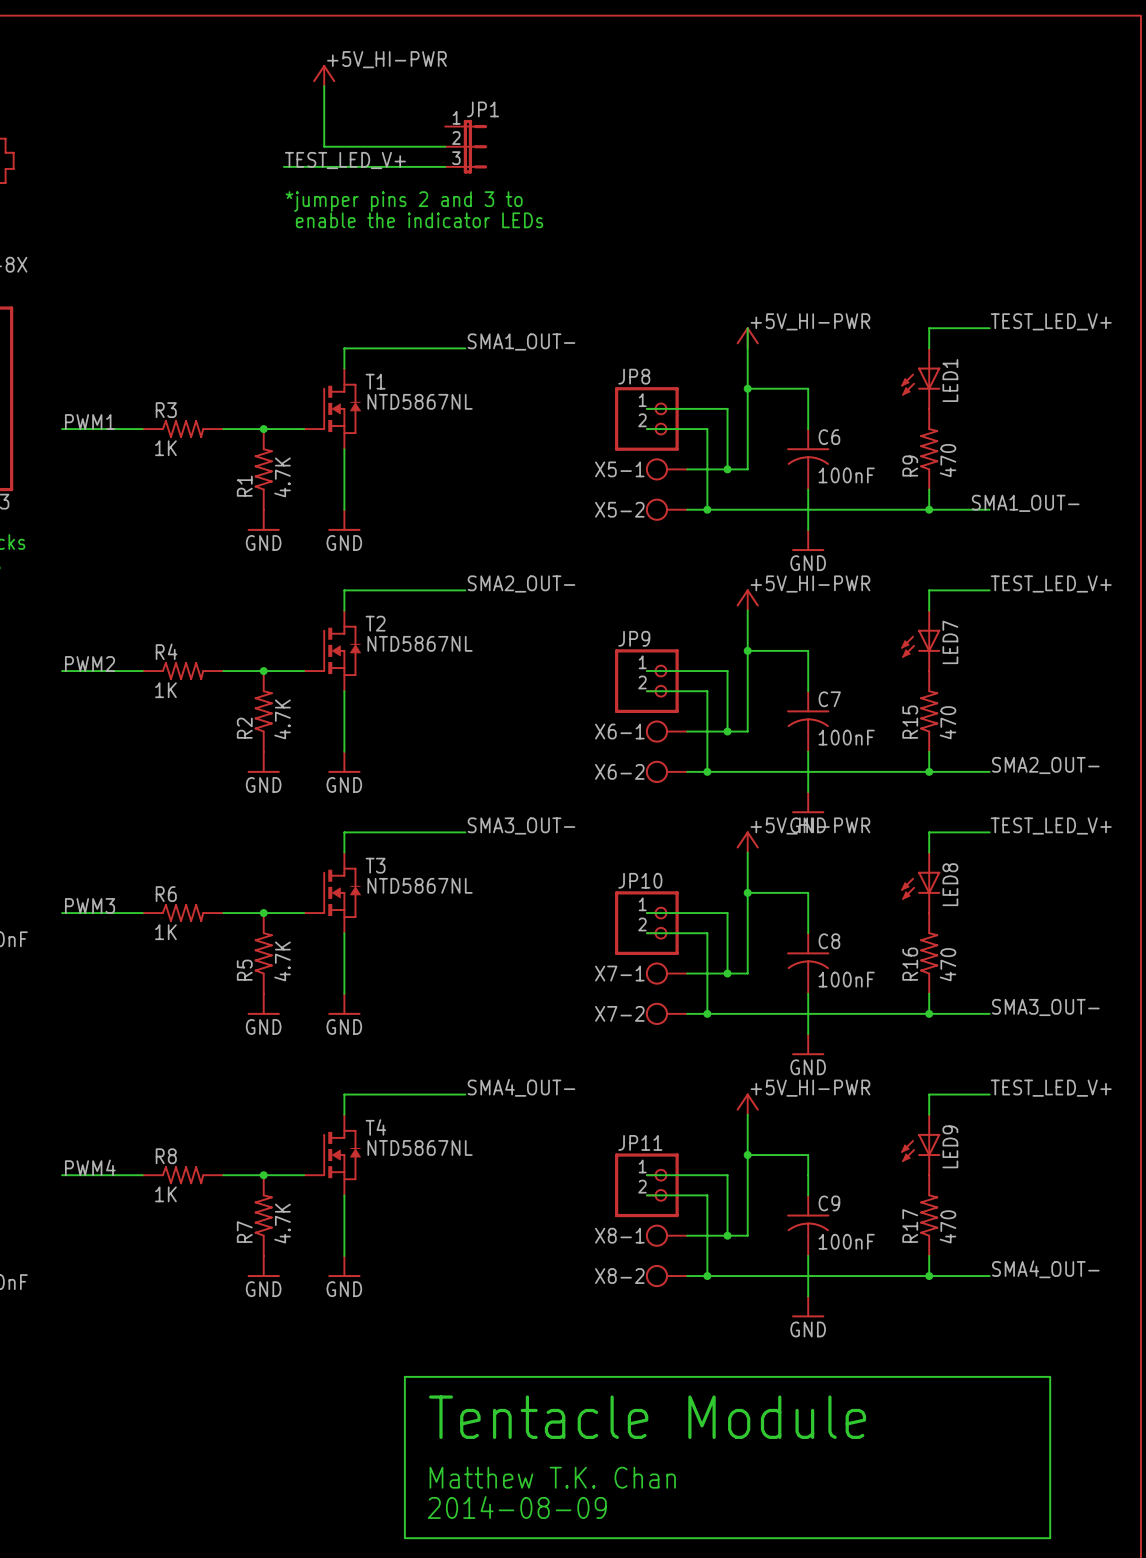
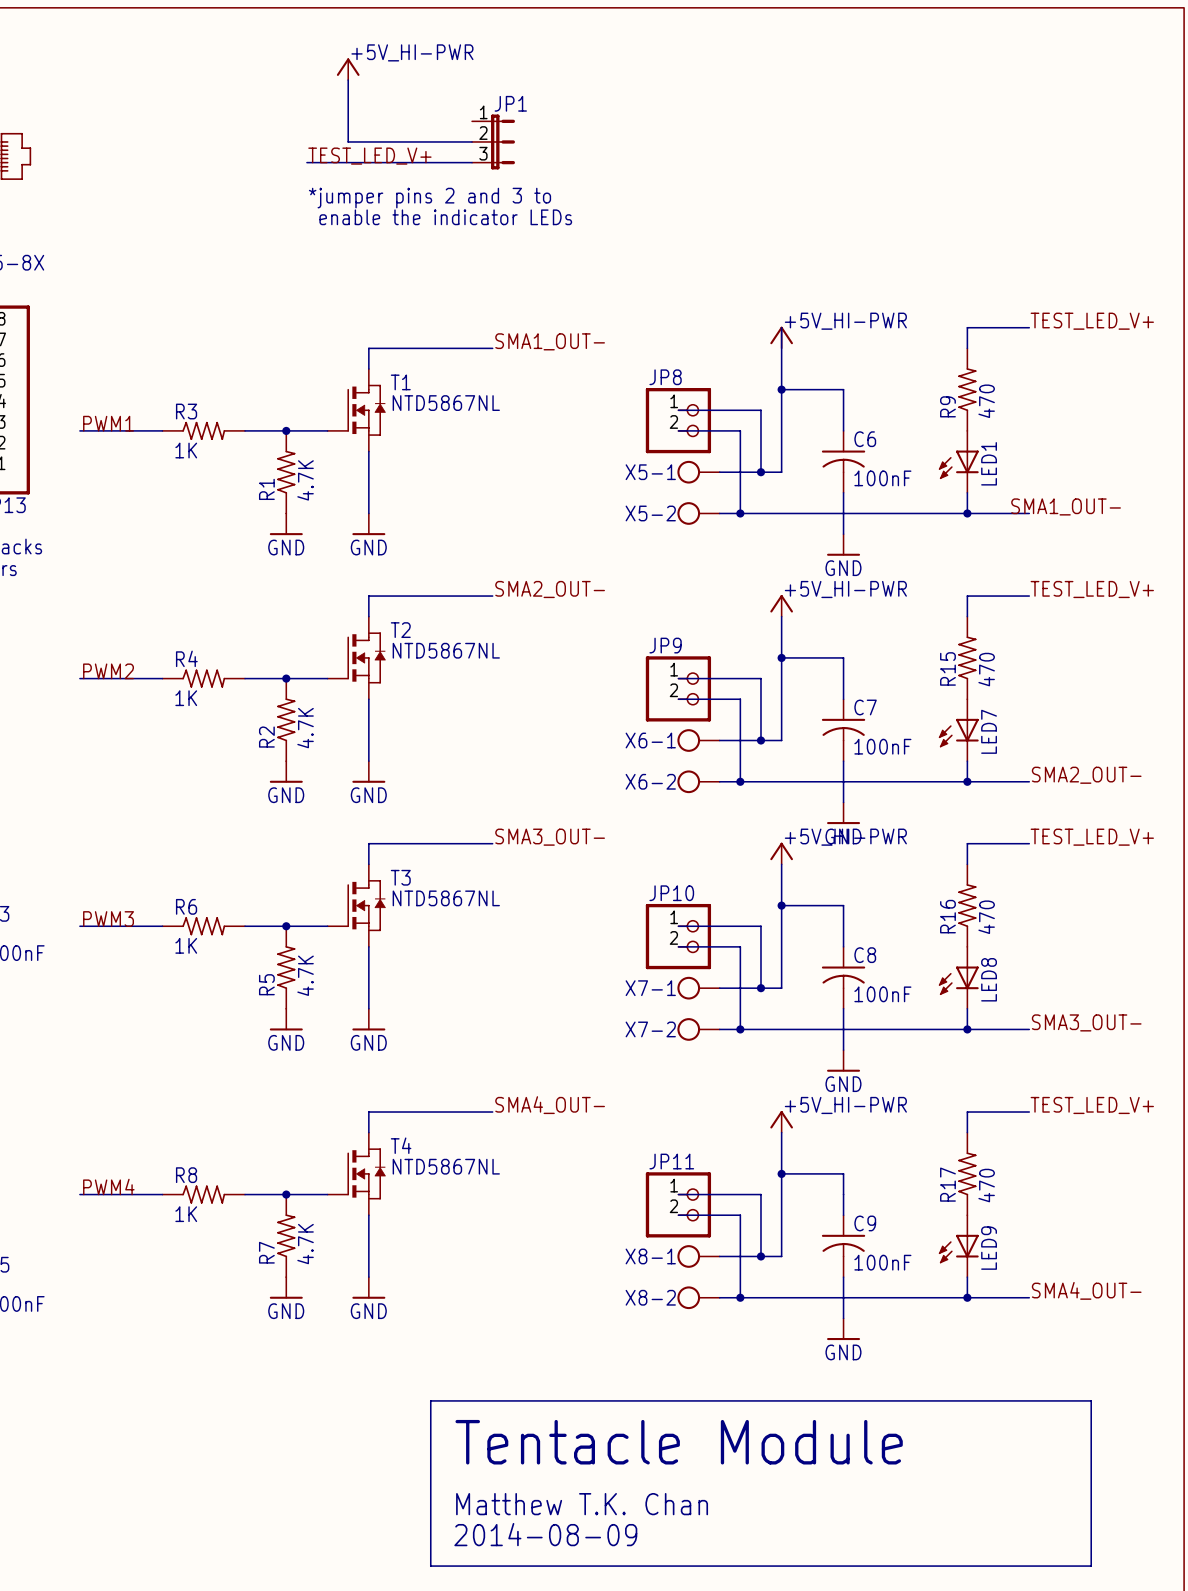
LED1 position: (920, 378) -> (958, 461)
R9 position: (929, 449) -> (967, 389)
LED7 position: (920, 640) -> (958, 730)
R15 position: (929, 711) -> (967, 657)
LED8 position: (920, 882) -> (958, 977)
R16 position: (929, 953) -> (967, 905)
LED9 position: (920, 1144) -> (958, 1246)
R17 position: (929, 1215) -> (967, 1173)

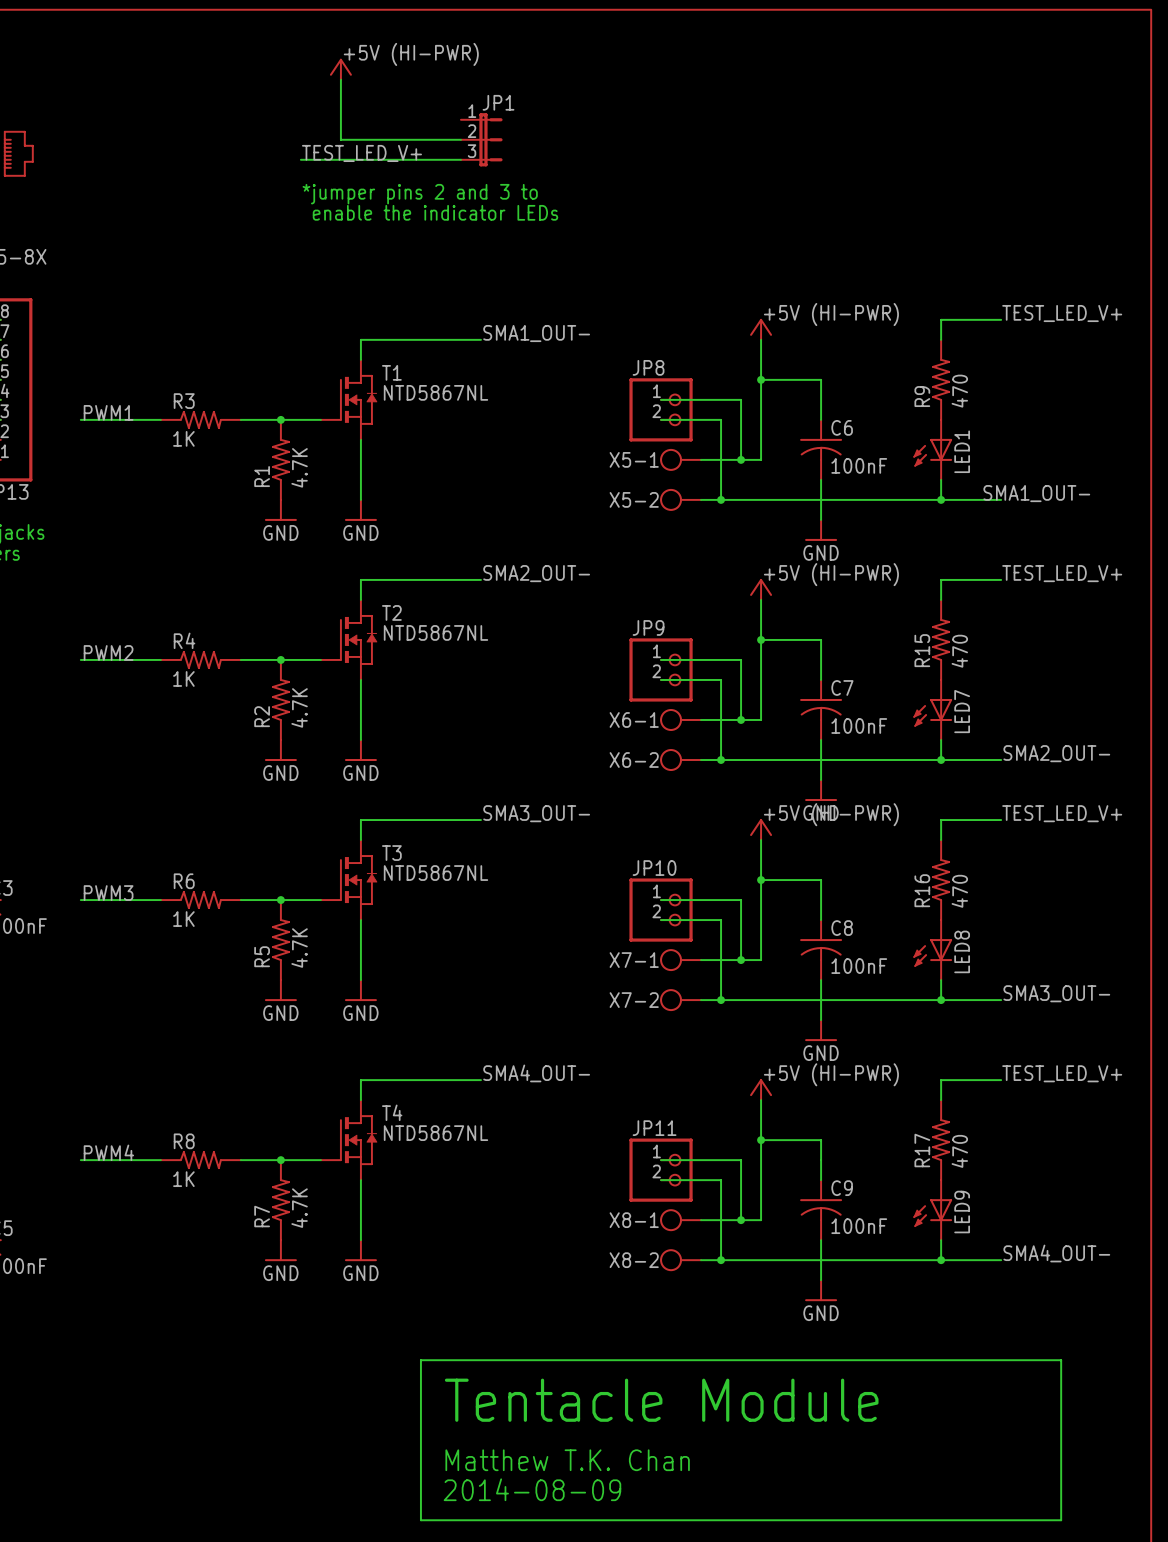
power symbol: +5V_HI-PWR (348, 69) -> +5V (HI-PWR) (340, 69)
power symbol: +5V_HI-PWR (781, 337) -> +5V (HI-PWR) (761, 329)
power symbol: +5V_HI-PWR (781, 605) -> +5V (HI-PWR) (761, 589)
power symbol: +5V_HI-PWR (781, 853) -> +5V (HI-PWR) (761, 829)
power symbol: +5V_HI-PWR (781, 1121) -> +5V (HI-PWR) (761, 1089)

